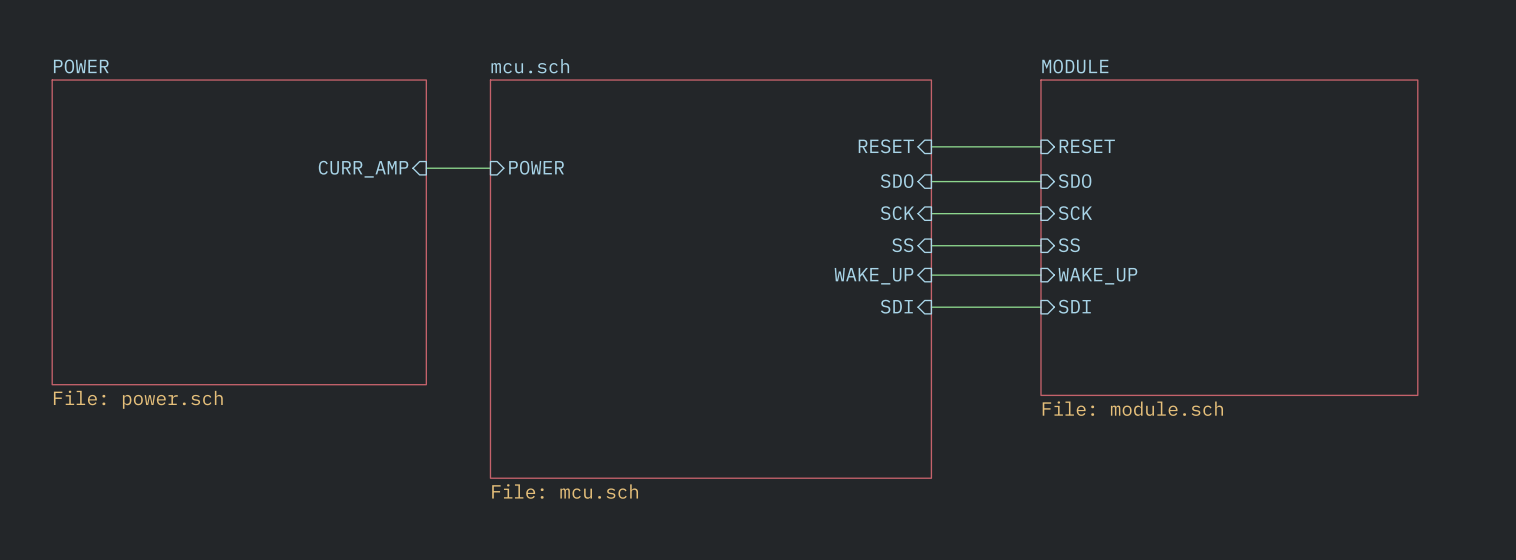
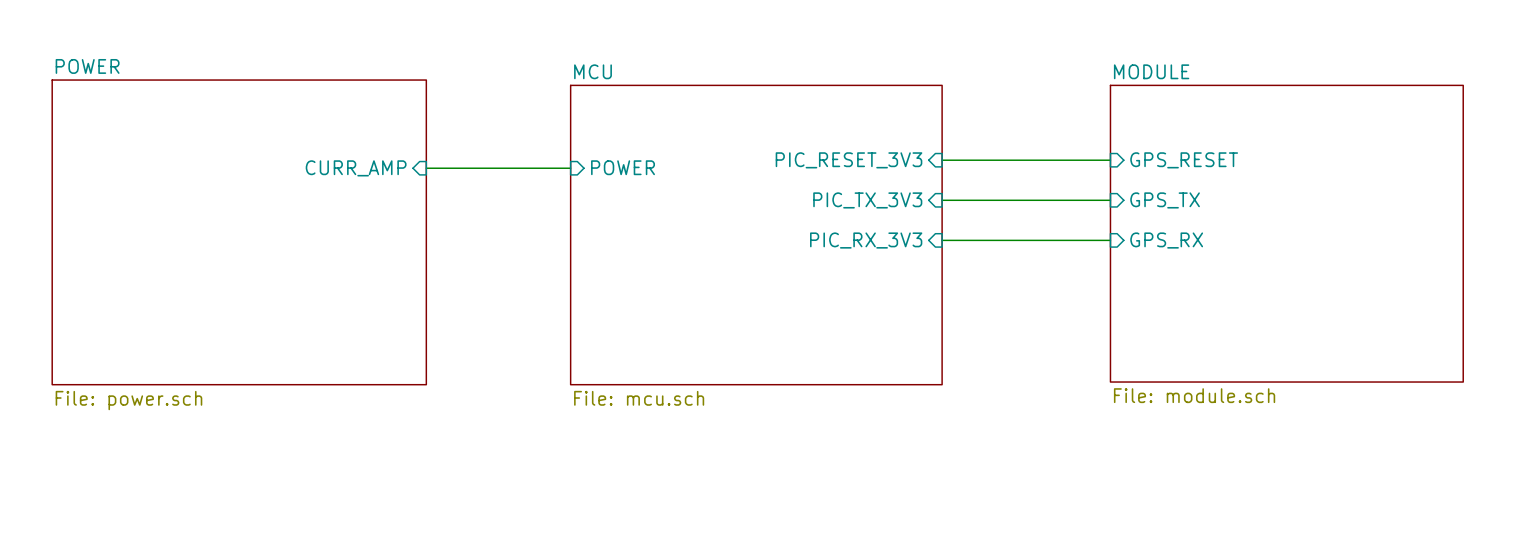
sheet pin: RESET (886, 146) -> none
wire: (931, 146) (1040, 146) -> none
sheet pin: RESET (1087, 146) -> GPS_RESET (1184, 160)
wire: none -> (942, 160) (1110, 160)
sheet pin: none -> PIC_RESET_3V3 (849, 160)
sheet pin position: POWER (536, 167) -> POWER (623, 167)
wire: none -> (490, 168) (570, 168)
sheet pin: SDO (897, 181) -> none
wire: (931, 181) (1040, 181) -> none
sheet pin: SDO (1075, 181) -> none
wire: none -> (942, 200) (1110, 200)
sheet pin: none -> PIC_TX_3V3 (867, 200)
sheet pin: none -> GPS_TX (1165, 200)
sheet pin: SCK (897, 213) -> none
wire: (931, 213) (1040, 213) -> none
sheet pin: SCK (1075, 213) -> none
sheet MODULE: none -> File: module.sch (1286, 233)
sheet MCU: none -> File: mcu.sch (756, 235)
sheet MODULE: File: module.sch (1229, 237) -> none
wire: none -> (942, 240) (1110, 240)
sheet pin: none -> PIC_RX_3V3 (866, 240)
sheet pin: none -> GPS_RX (1166, 240)
sheet pin: SS (902, 245) -> none
wire: (931, 245) (1040, 245) -> none
sheet pin: SS (1069, 245) -> none
wire: (931, 275) (1040, 275) -> none
sheet pin: WAKE_UP (874, 276) -> none
sheet pin: WAKE_UP (1097, 276) -> none
sheet mcu.sch: File: mcu.sch (710, 279) -> none
sheet pin: SDI (896, 306) -> none
sheet pin: SDI (1074, 306) -> none
wire: (931, 307) (1040, 307) -> none

